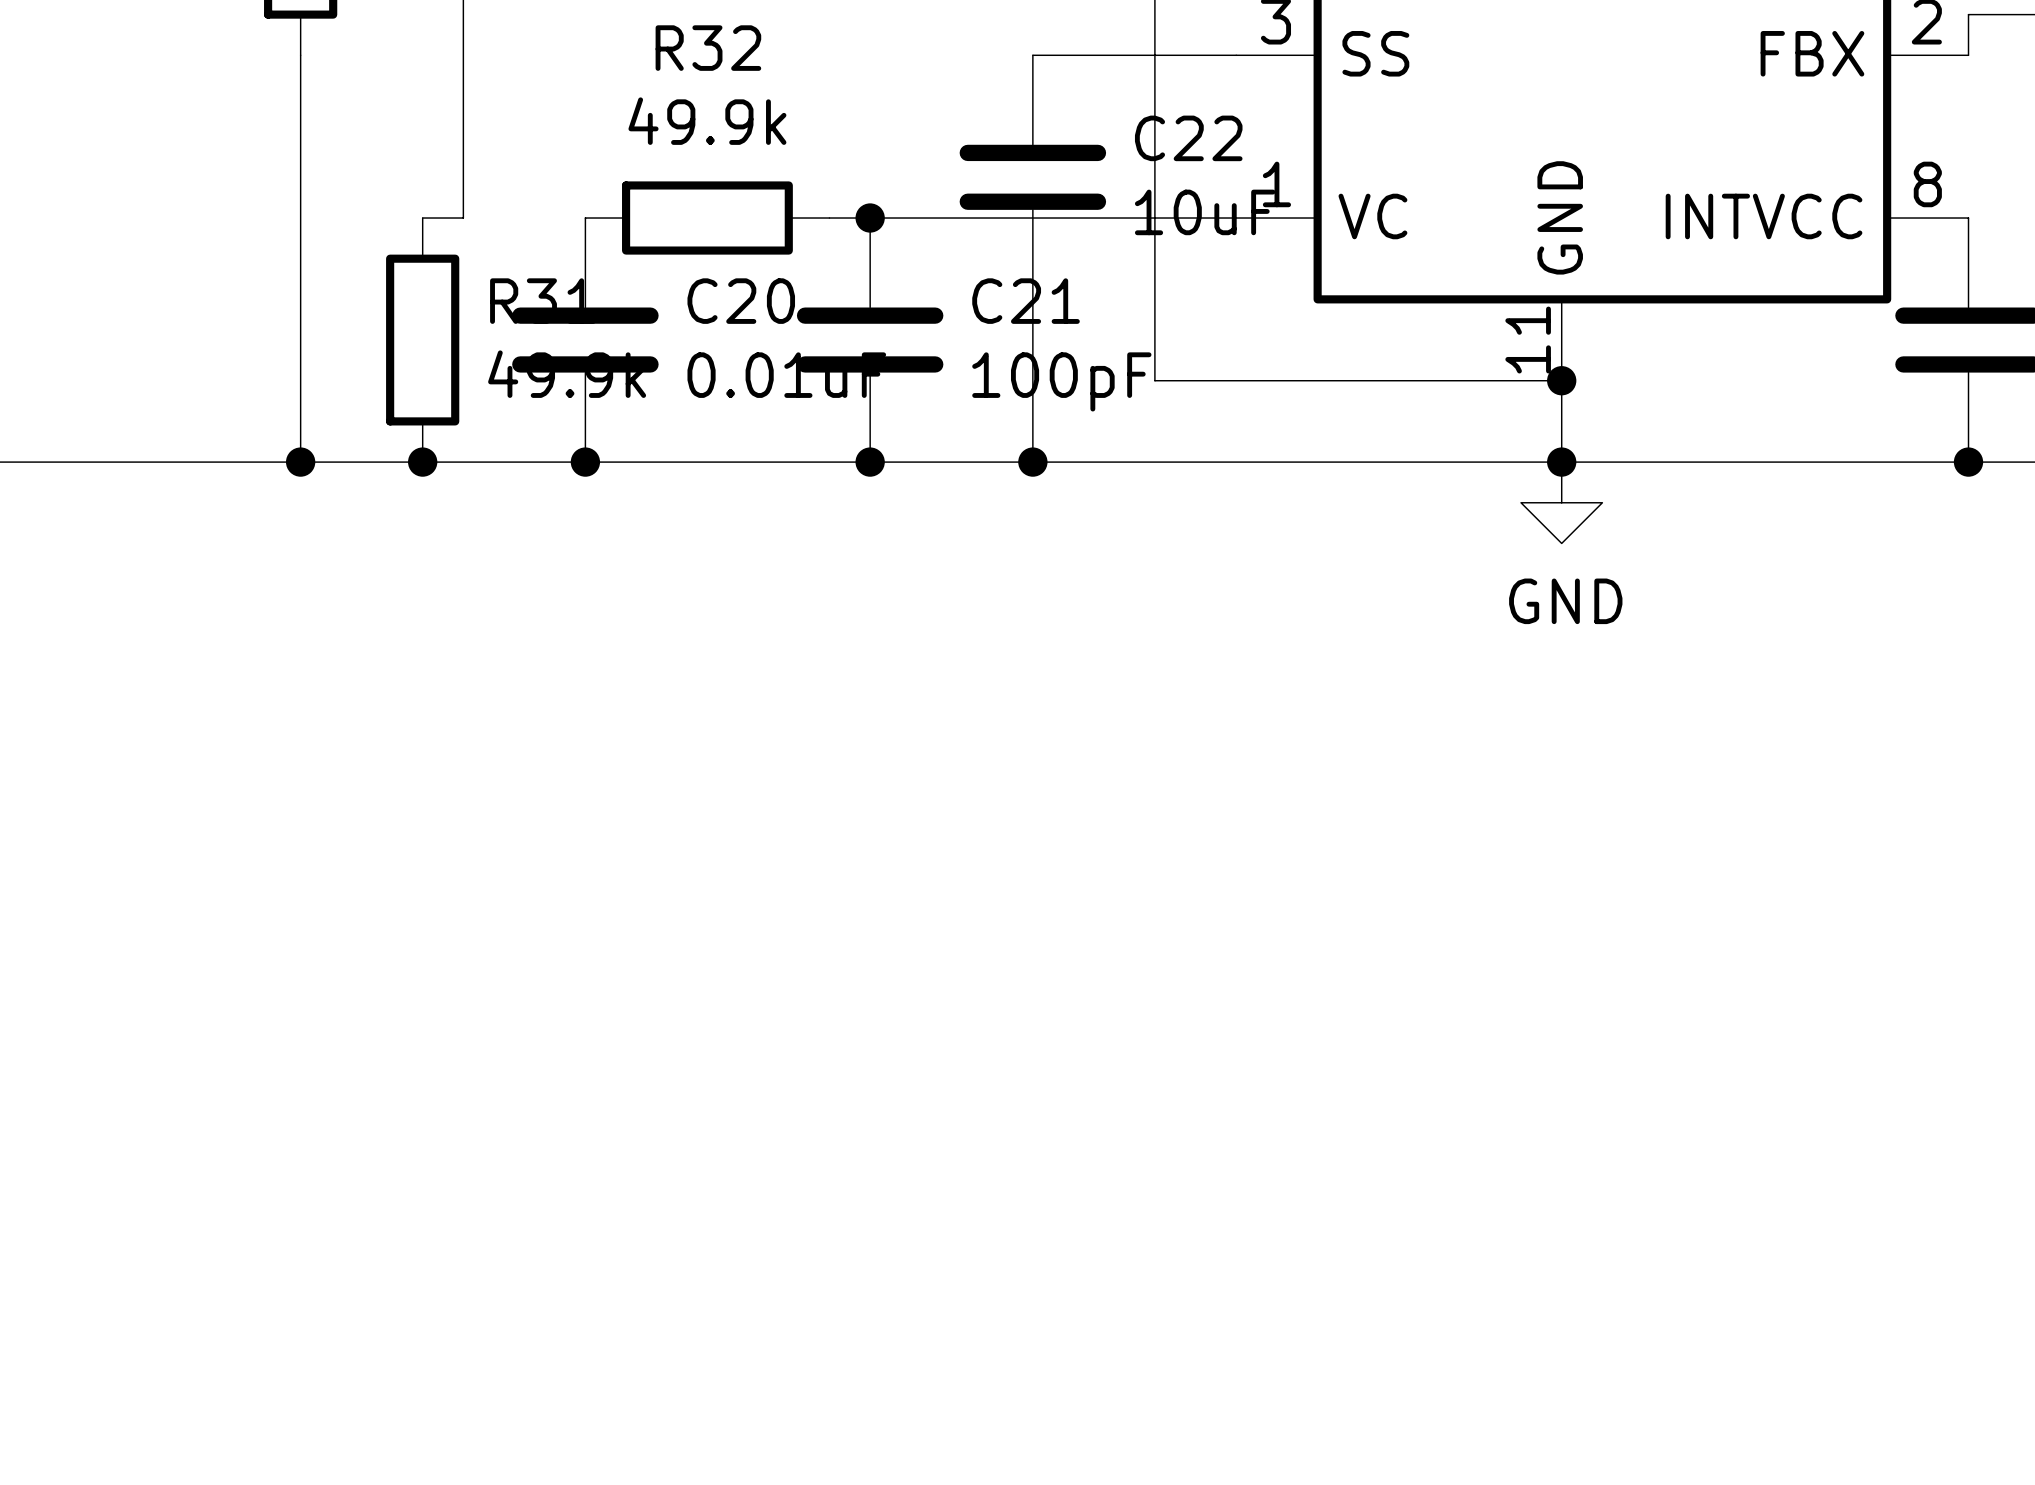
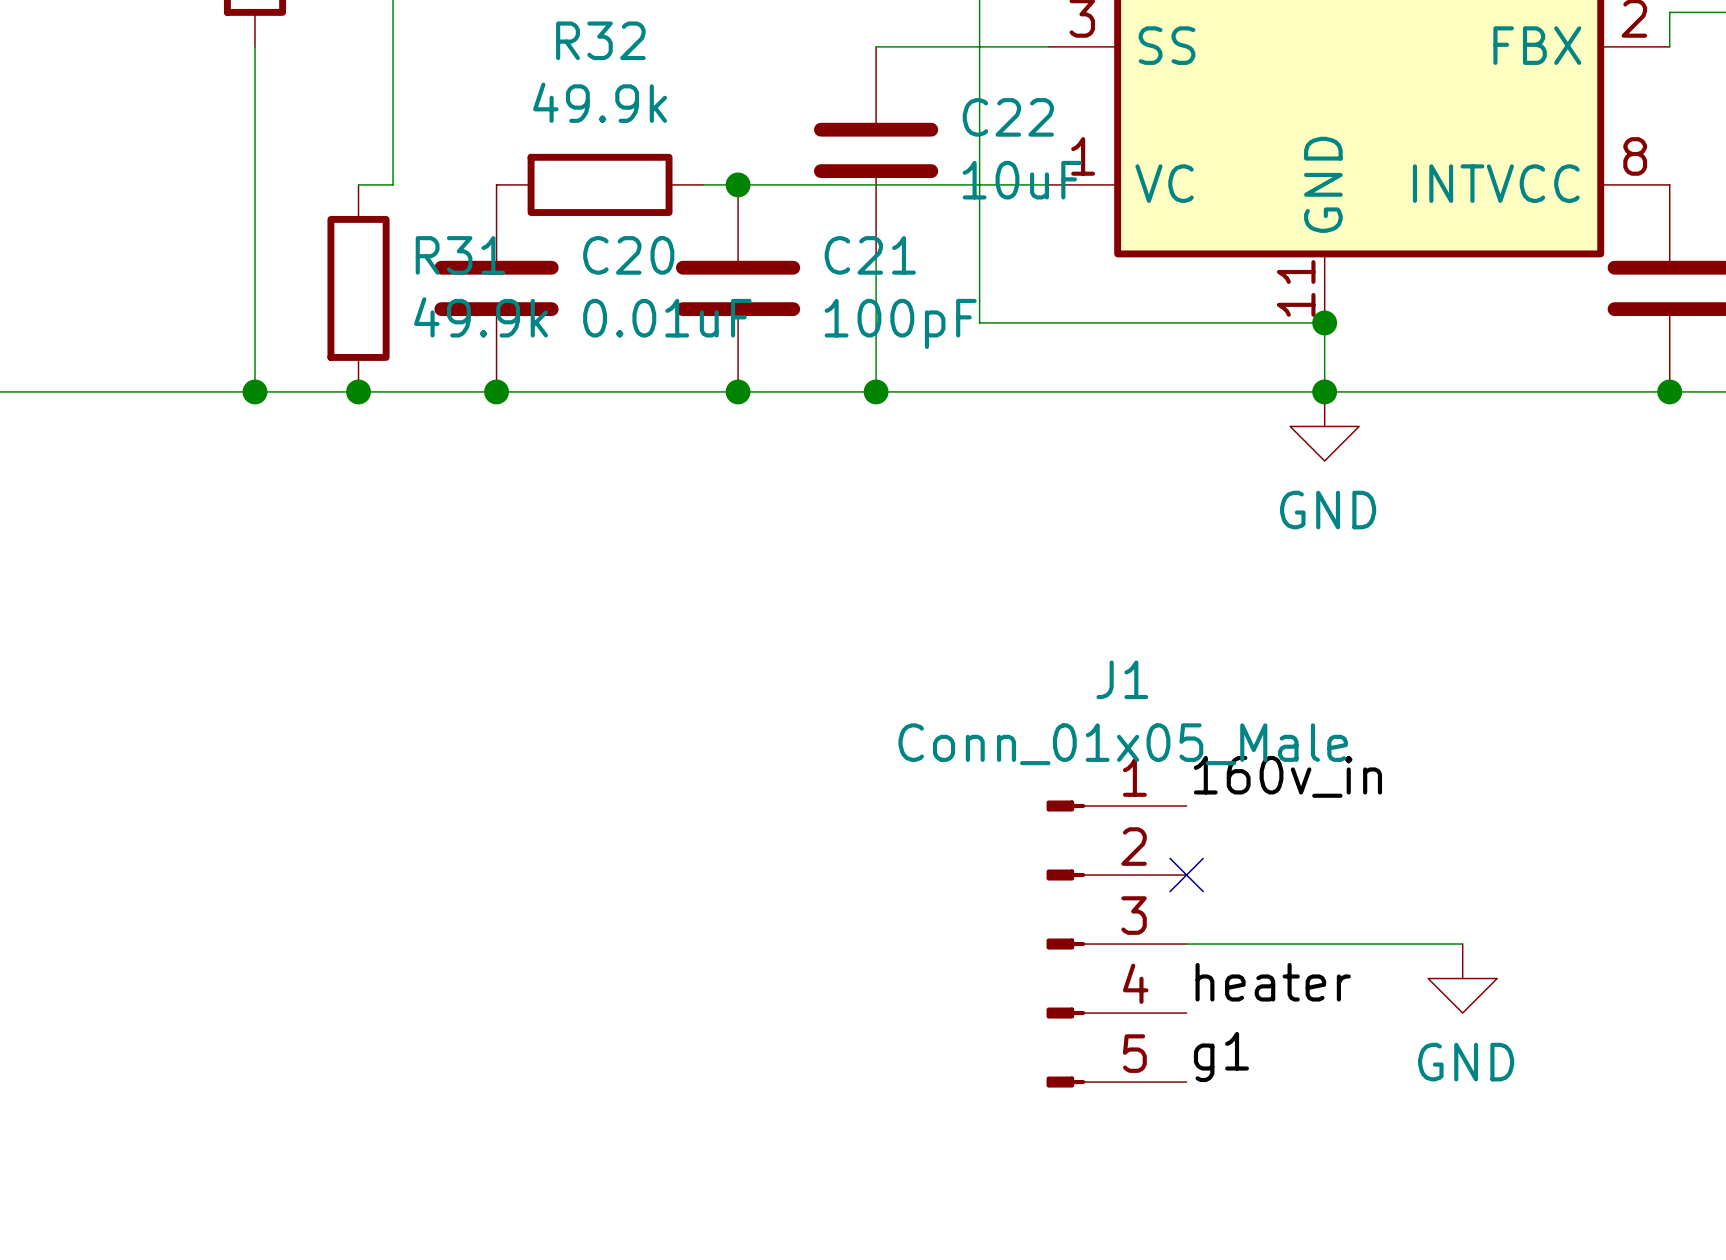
label: none -> 160v_in (1287, 776)
no-connect mark: none -> (1186, 875)
J1: none -> Conn_01x05_Male (1116, 944)
wire: none -> (1186, 944) (1462, 944)
power symbol: none -> GND (1462, 978)
label: none -> heater (1273, 982)
label: none -> g1 (1221, 1057)

